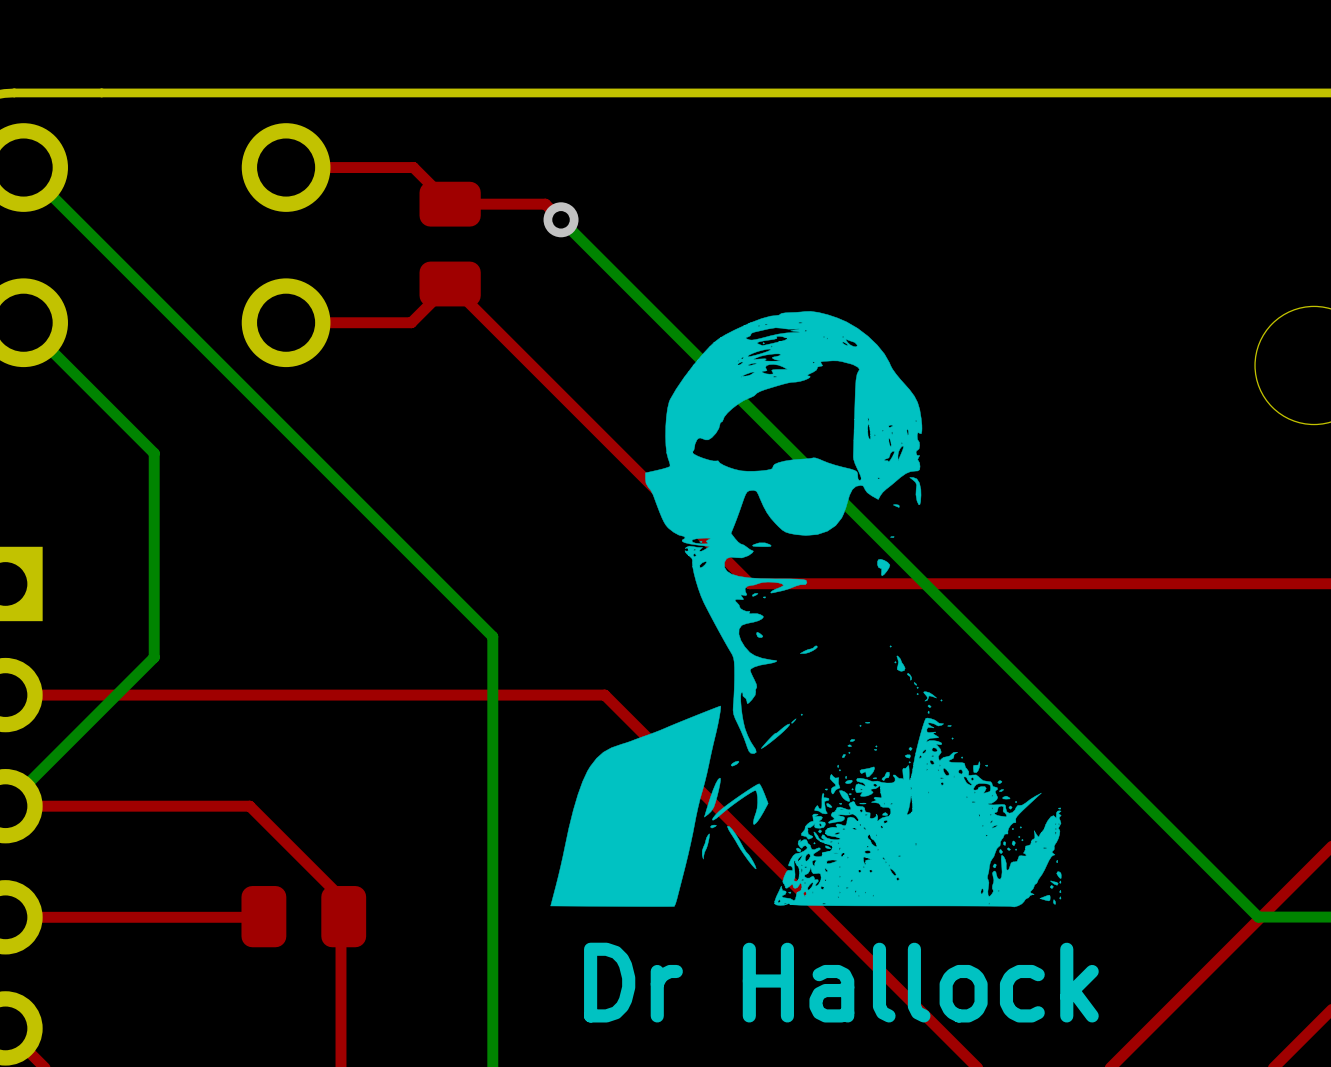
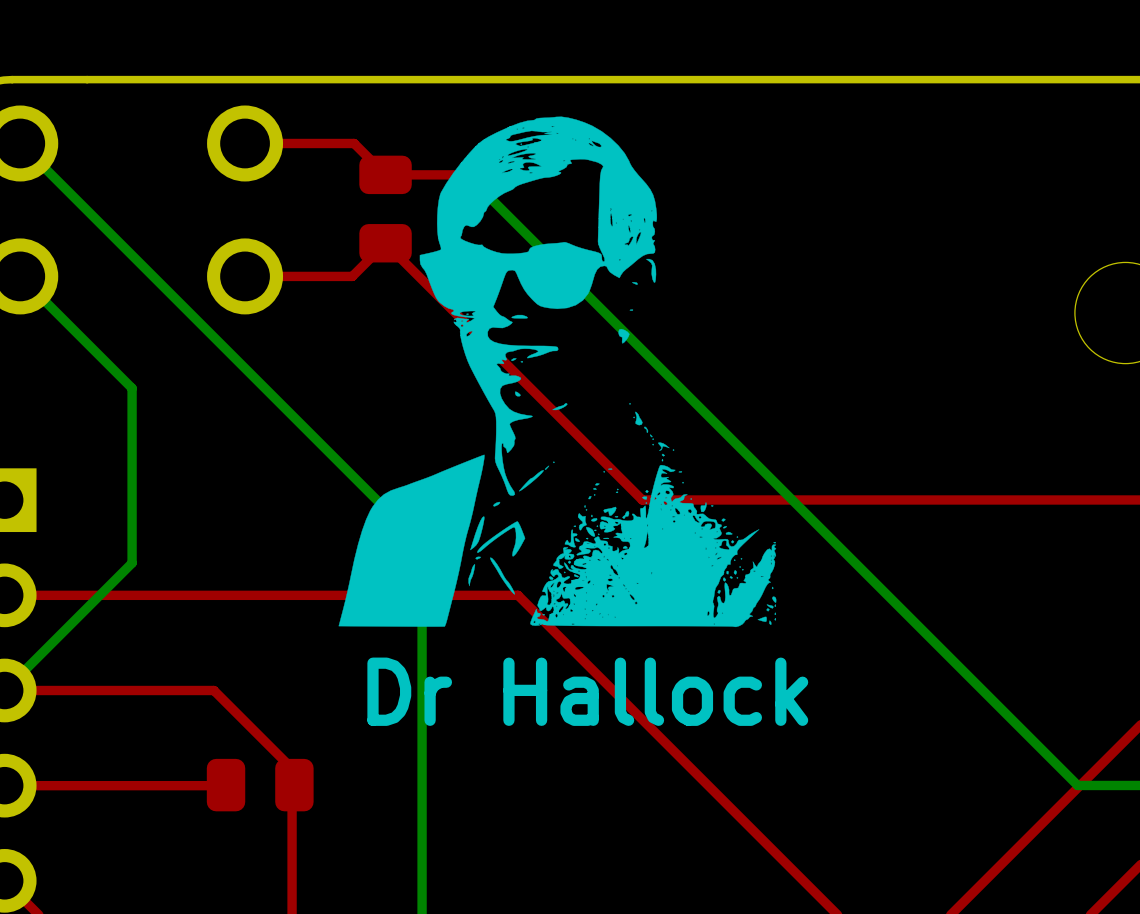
drawing position: (805, 609) -> (557, 371)

